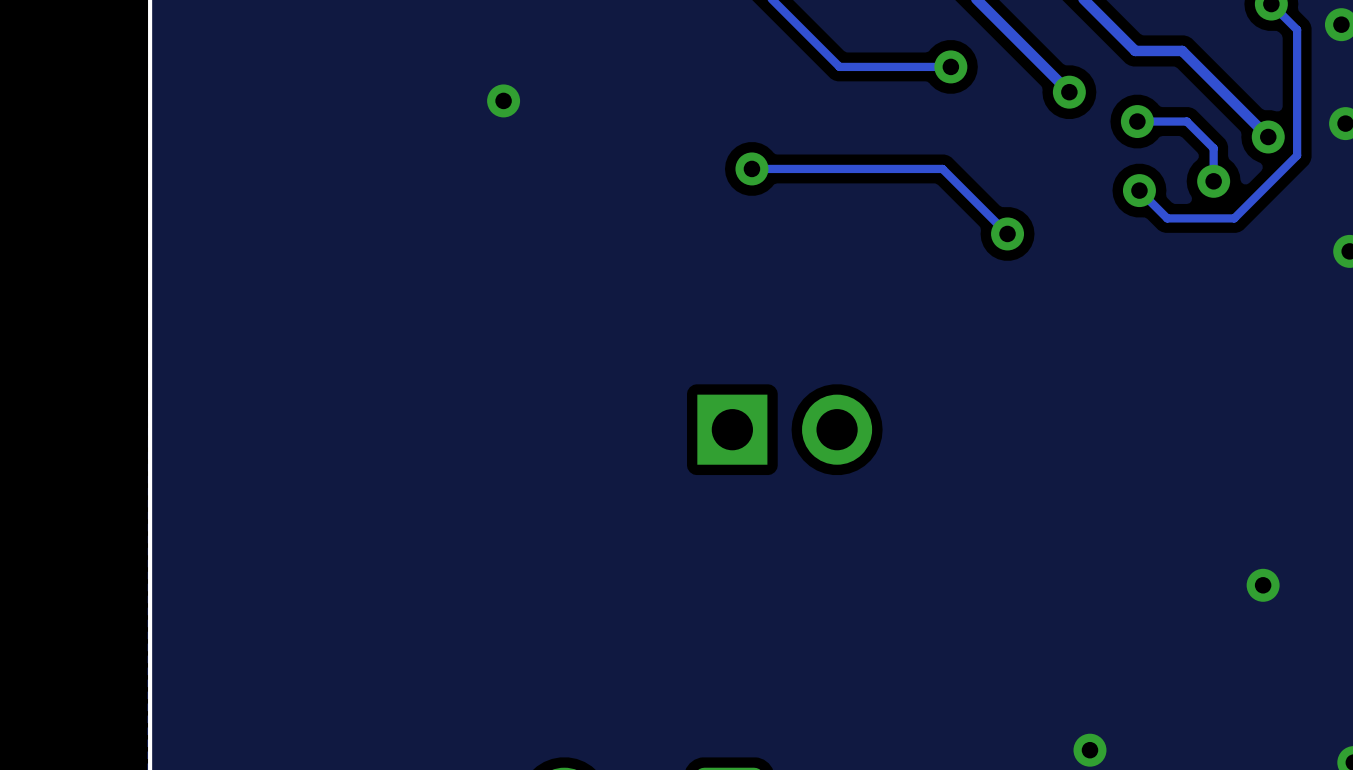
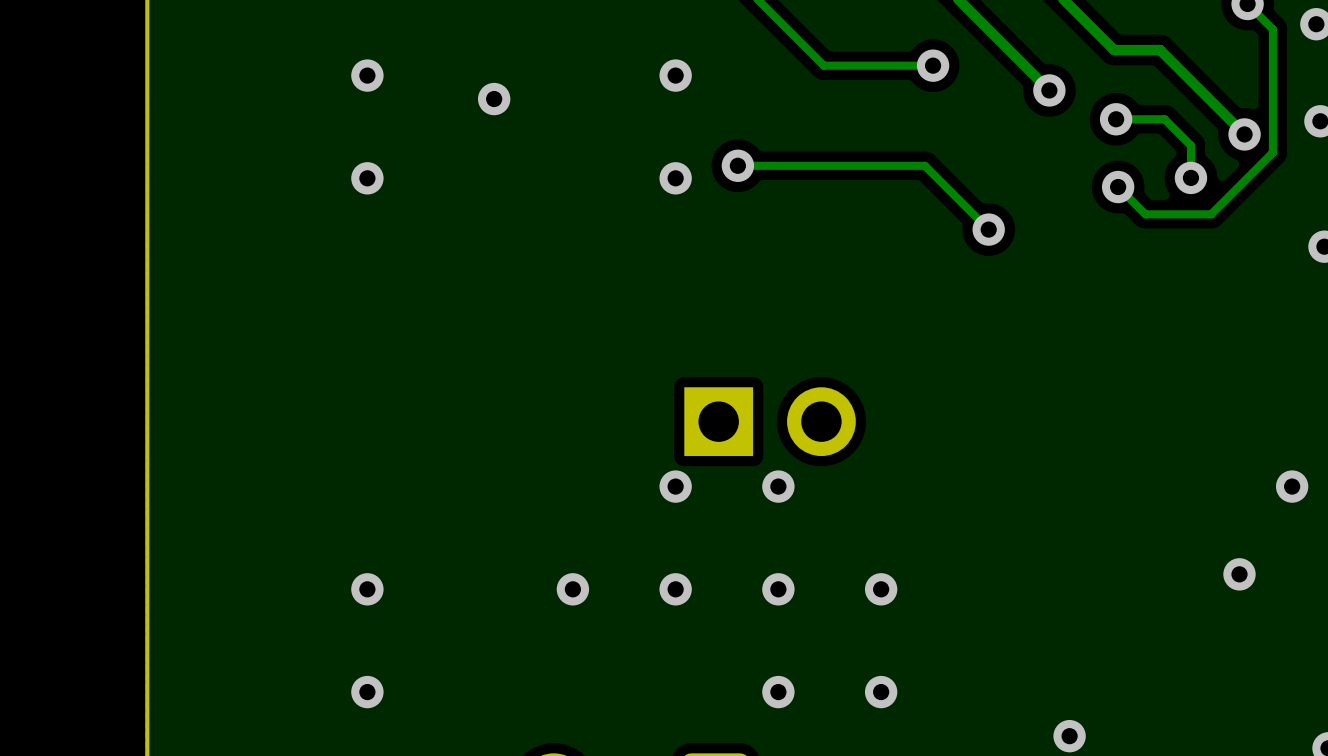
via: none -> (367, 75)
via: none -> (675, 75)
via: none -> (367, 178)
via: none -> (675, 178)
via: none -> (675, 486)
via: none -> (778, 486)
via: none -> (1292, 486)
via: none -> (367, 589)
via: none -> (572, 589)
via: none -> (675, 589)
via: none -> (778, 589)
via: none -> (881, 589)
via: none -> (367, 692)
via: none -> (778, 692)
via: none -> (881, 692)

